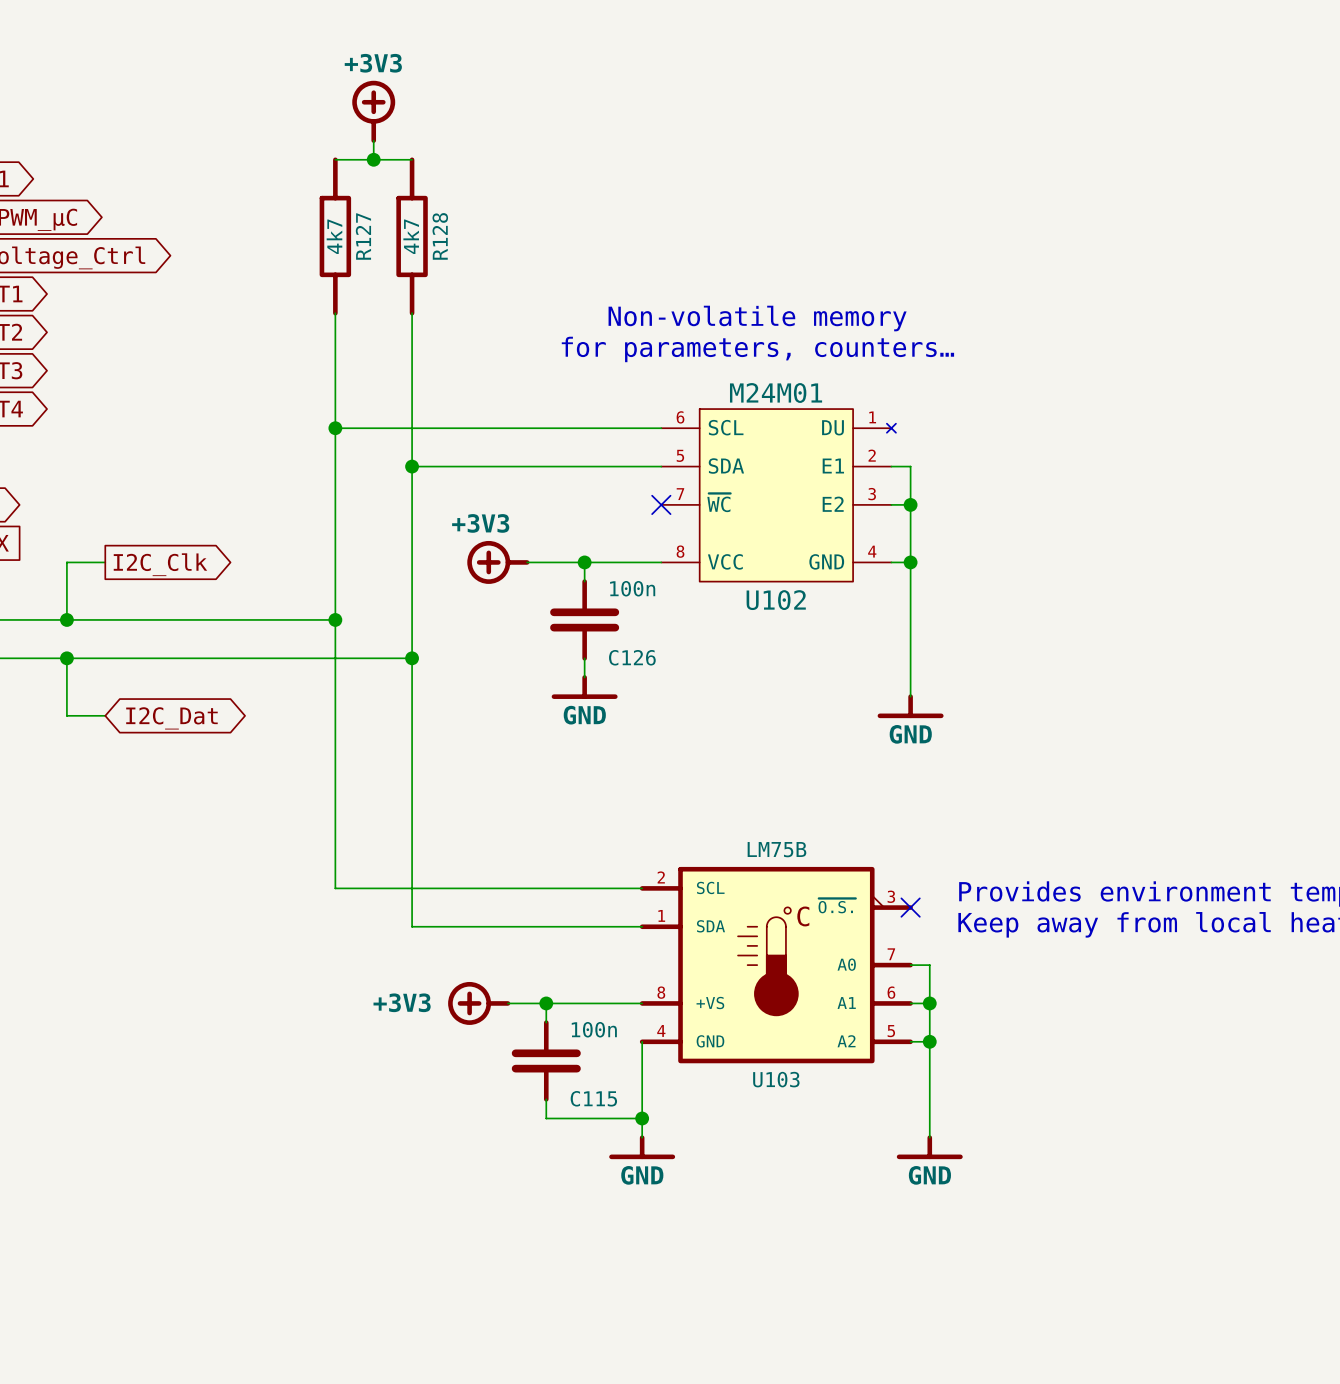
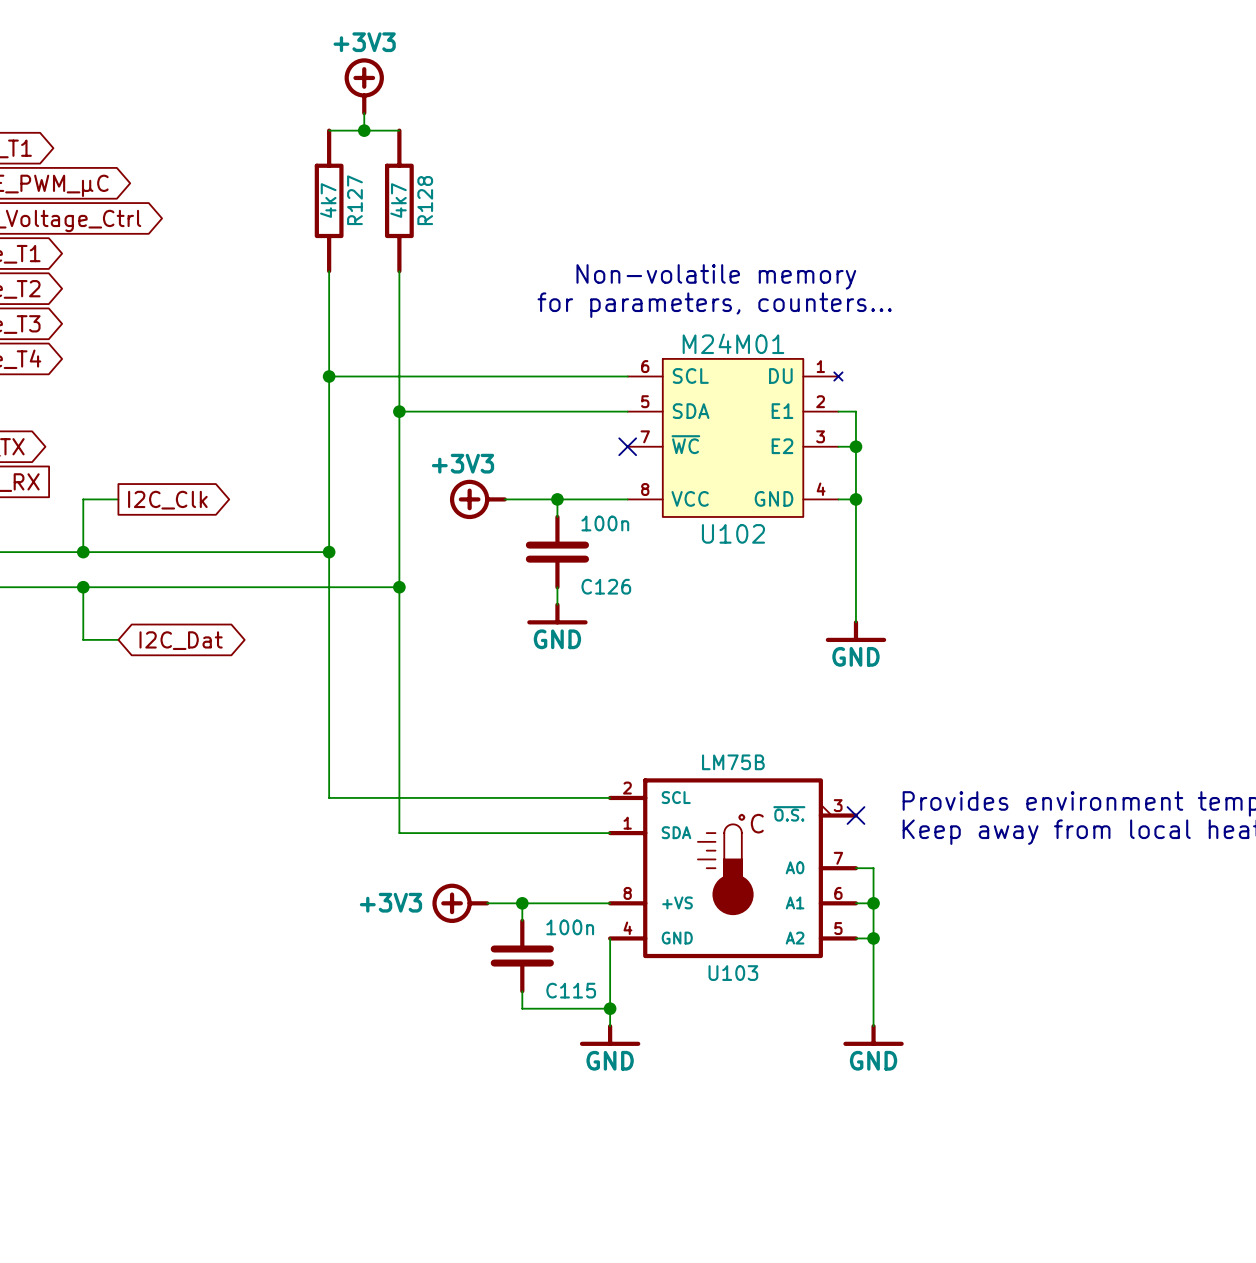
U103 symbol: [639, 866, 913, 1064] -> [608, 778, 859, 959]

